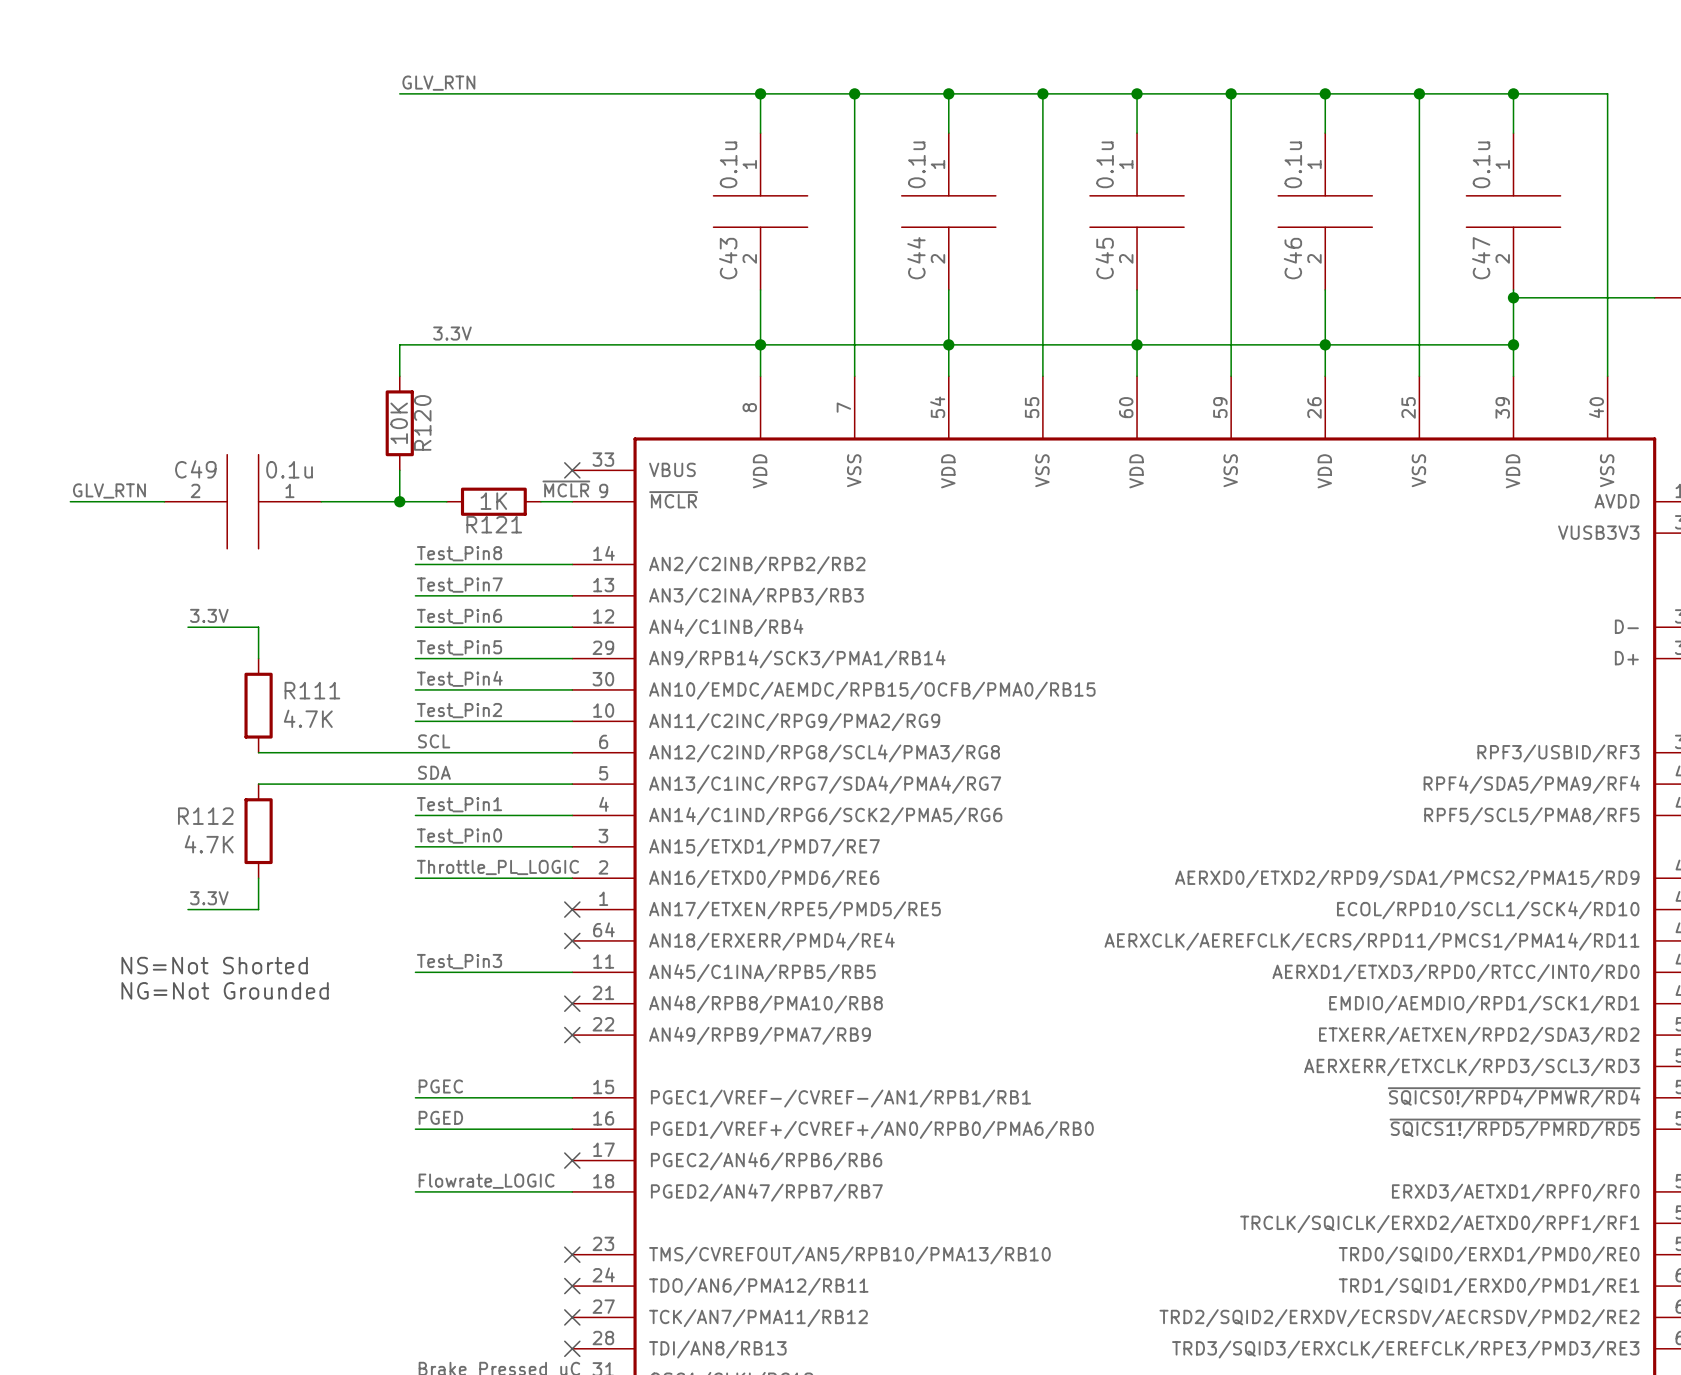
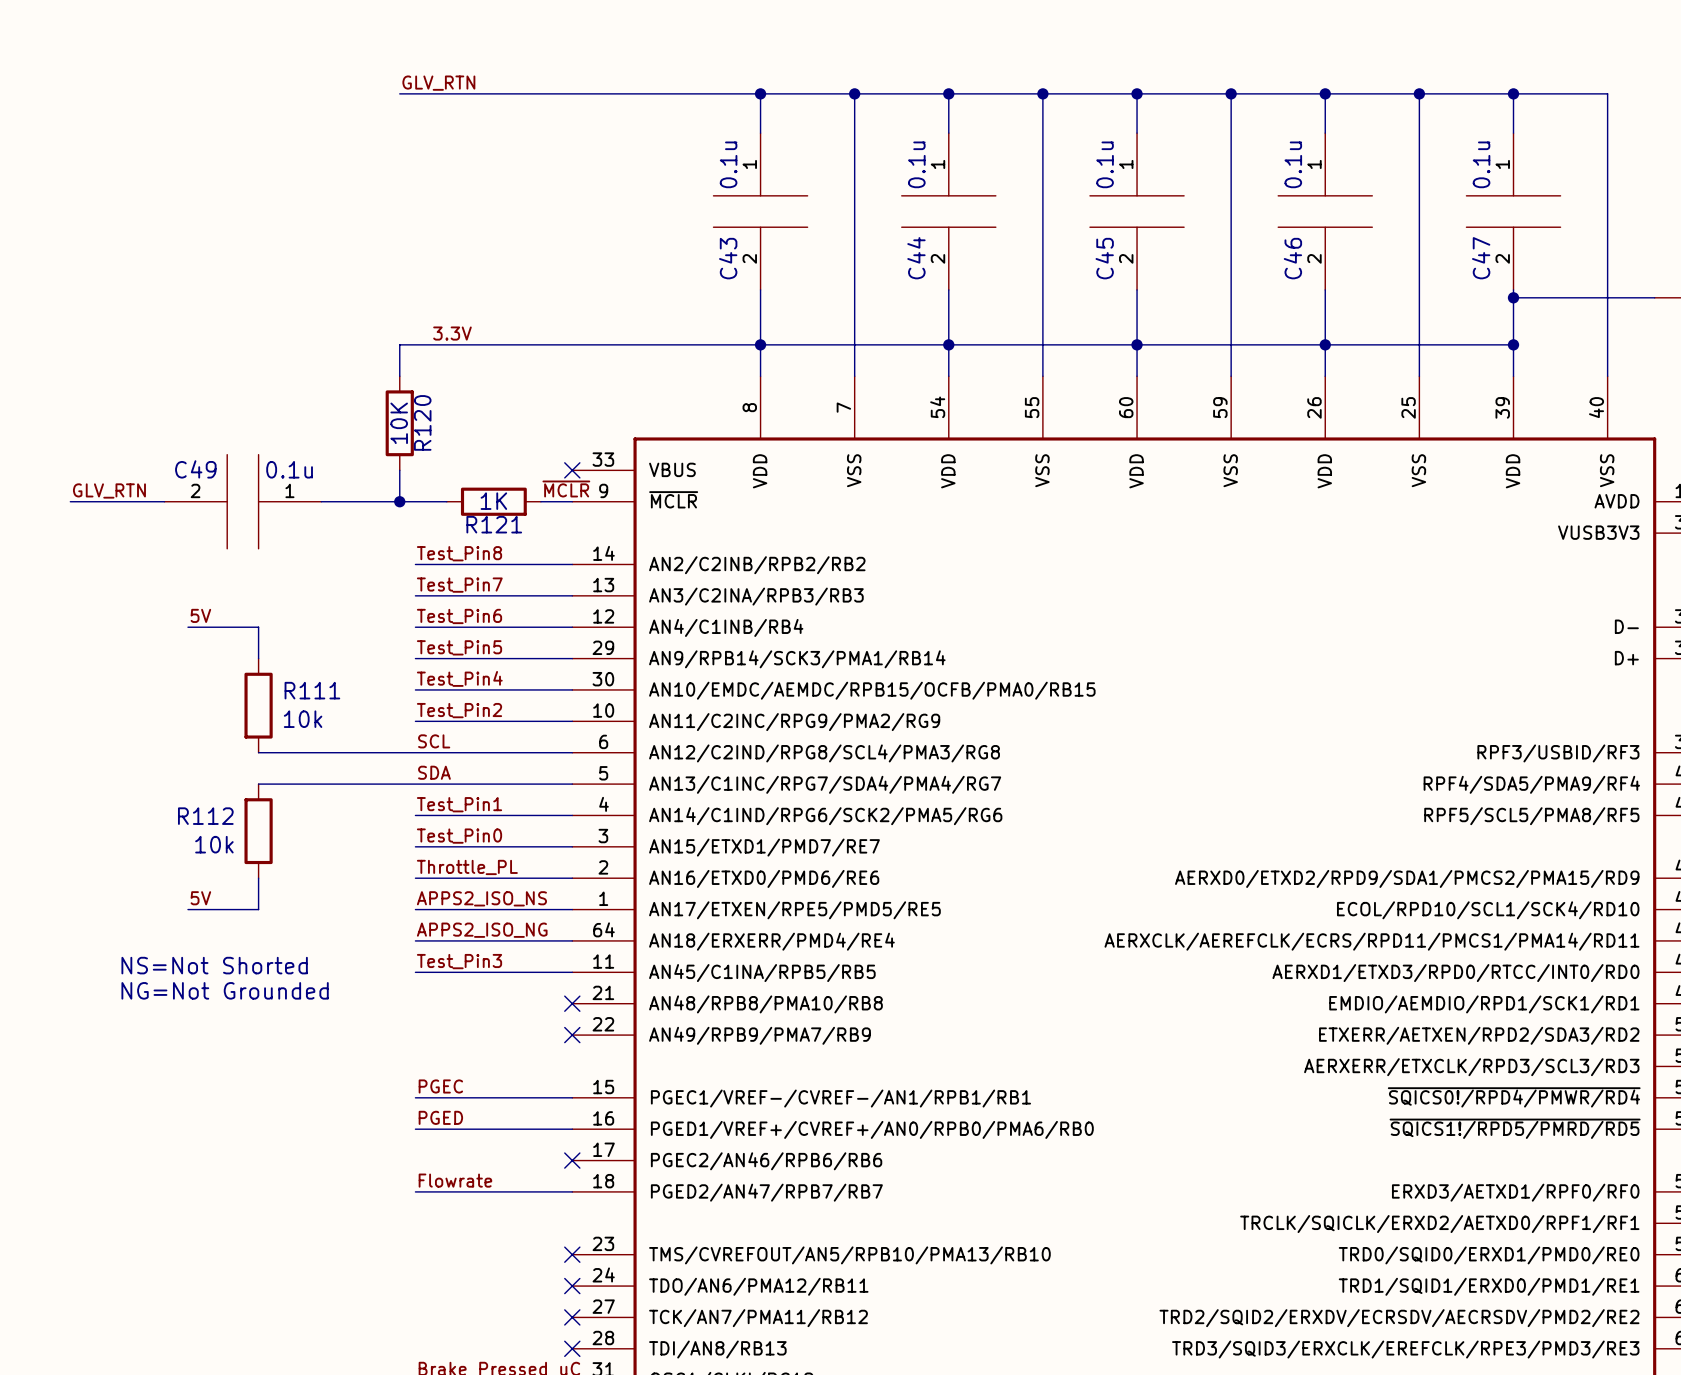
label: 3.3V (209, 615) -> 5V (200, 615)
R111 value: 4.7K (308, 718) -> 10k (303, 719)
R112 value: 4.7K (209, 844) -> 10k (214, 844)
label: Throttle_PL_LOGIC (497, 867) -> Throttle_PL (467, 867)
label: 3.3V (209, 898) -> 5V (200, 898)
label: none -> APPS2_ISO_NS (481, 898)
wire: none -> (415, 909) (572, 909)
no-connect mark: (572, 909) -> none
label: none -> APPS2_ISO_NG (482, 930)
wire: none -> (415, 940) (572, 940)
no-connect mark: (572, 940) -> none
label: Flowrate_LOGIC (486, 1181) -> Flowrate (455, 1180)

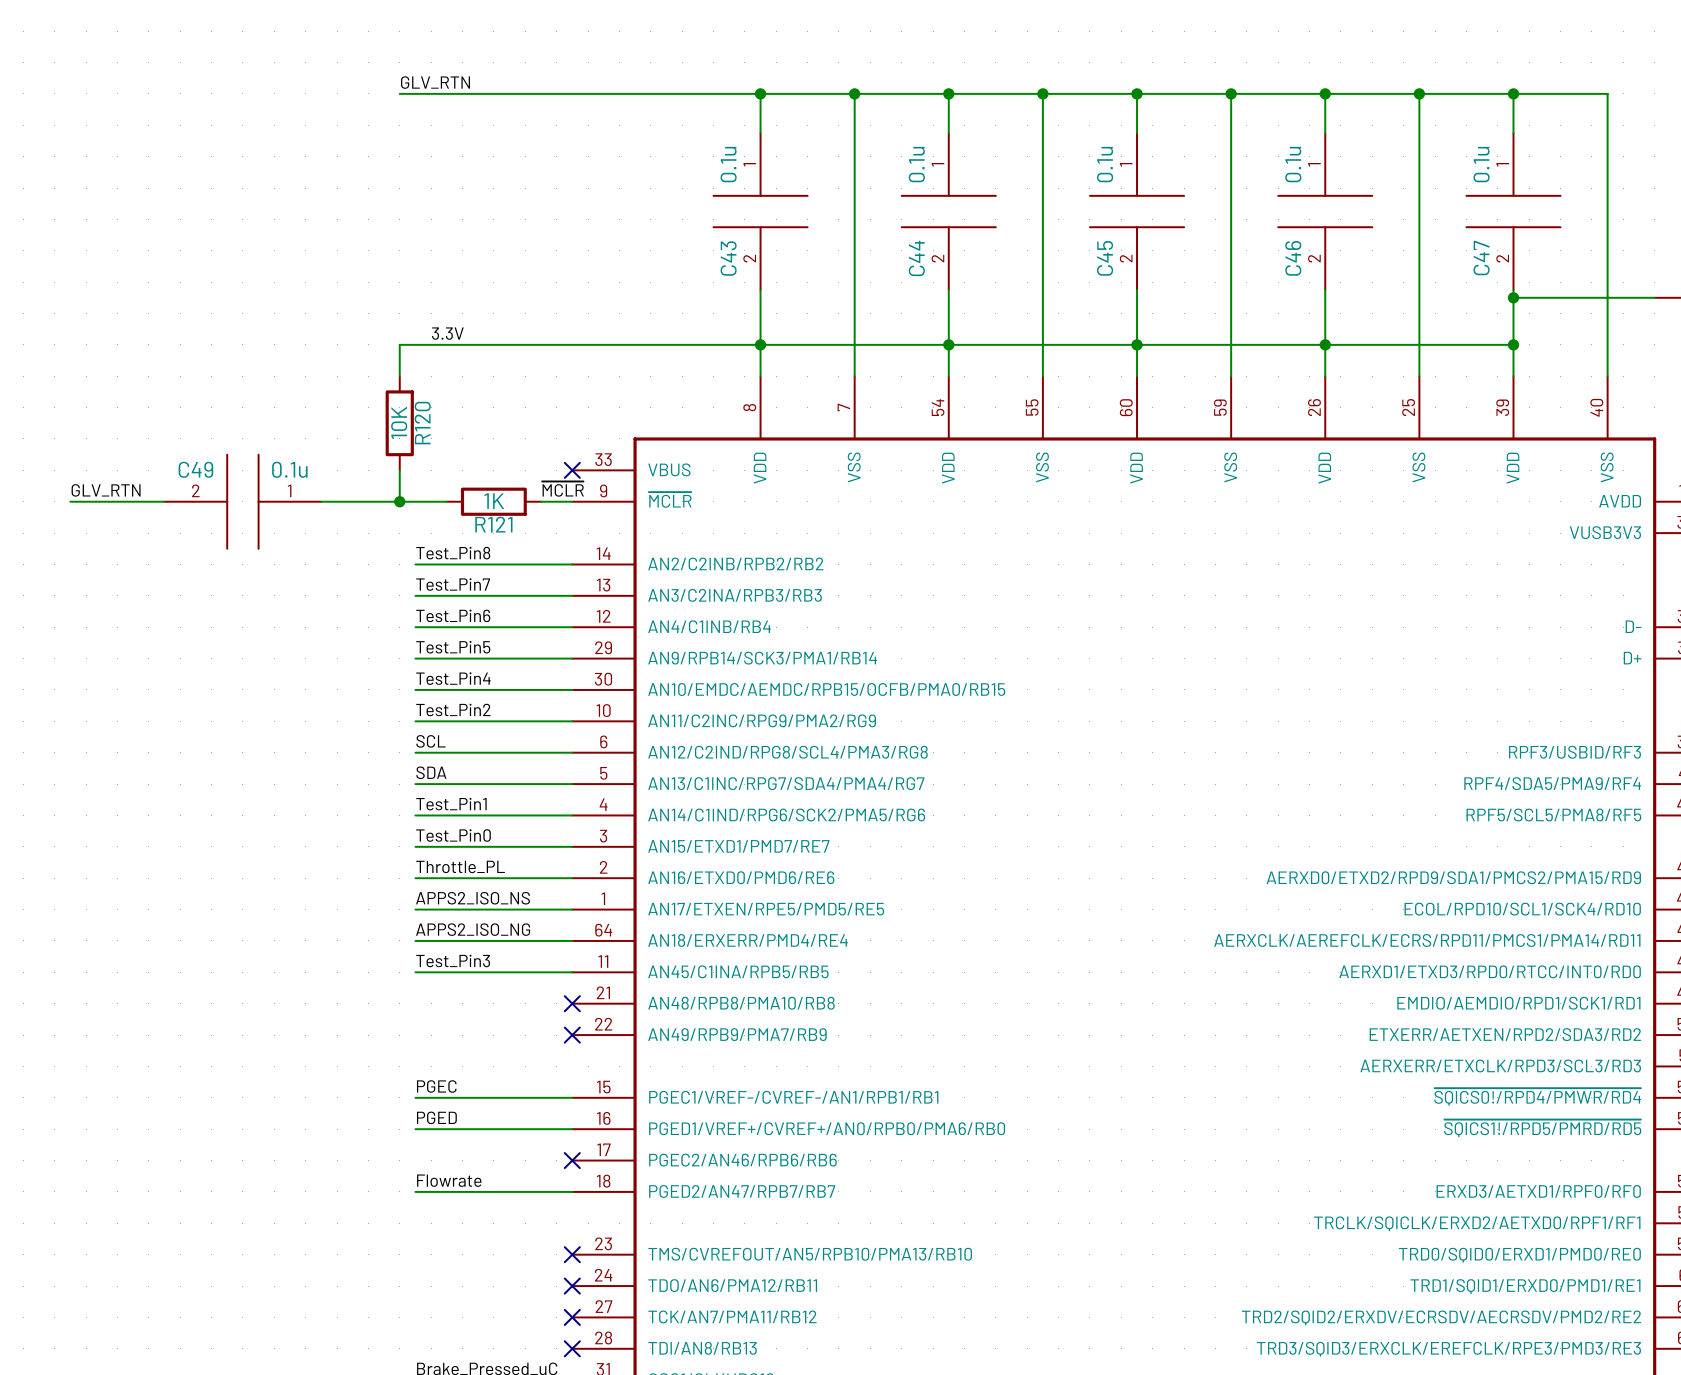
label: 5V (200, 615) -> none
wire: (187, 627) (258, 627) (258, 658) -> none
R111: 10k (258, 705) -> none
wire: (258, 752) (415, 752) -> none
wire: (258, 784) (415, 784) -> none
R112: 10k (258, 831) -> none
wire: (258, 878) (258, 909) (187, 909) -> none
label: 5V (200, 898) -> none
text: NS=Not Shorted (214, 965) -> none
text: NG=Not Grounded (225, 990) -> none

